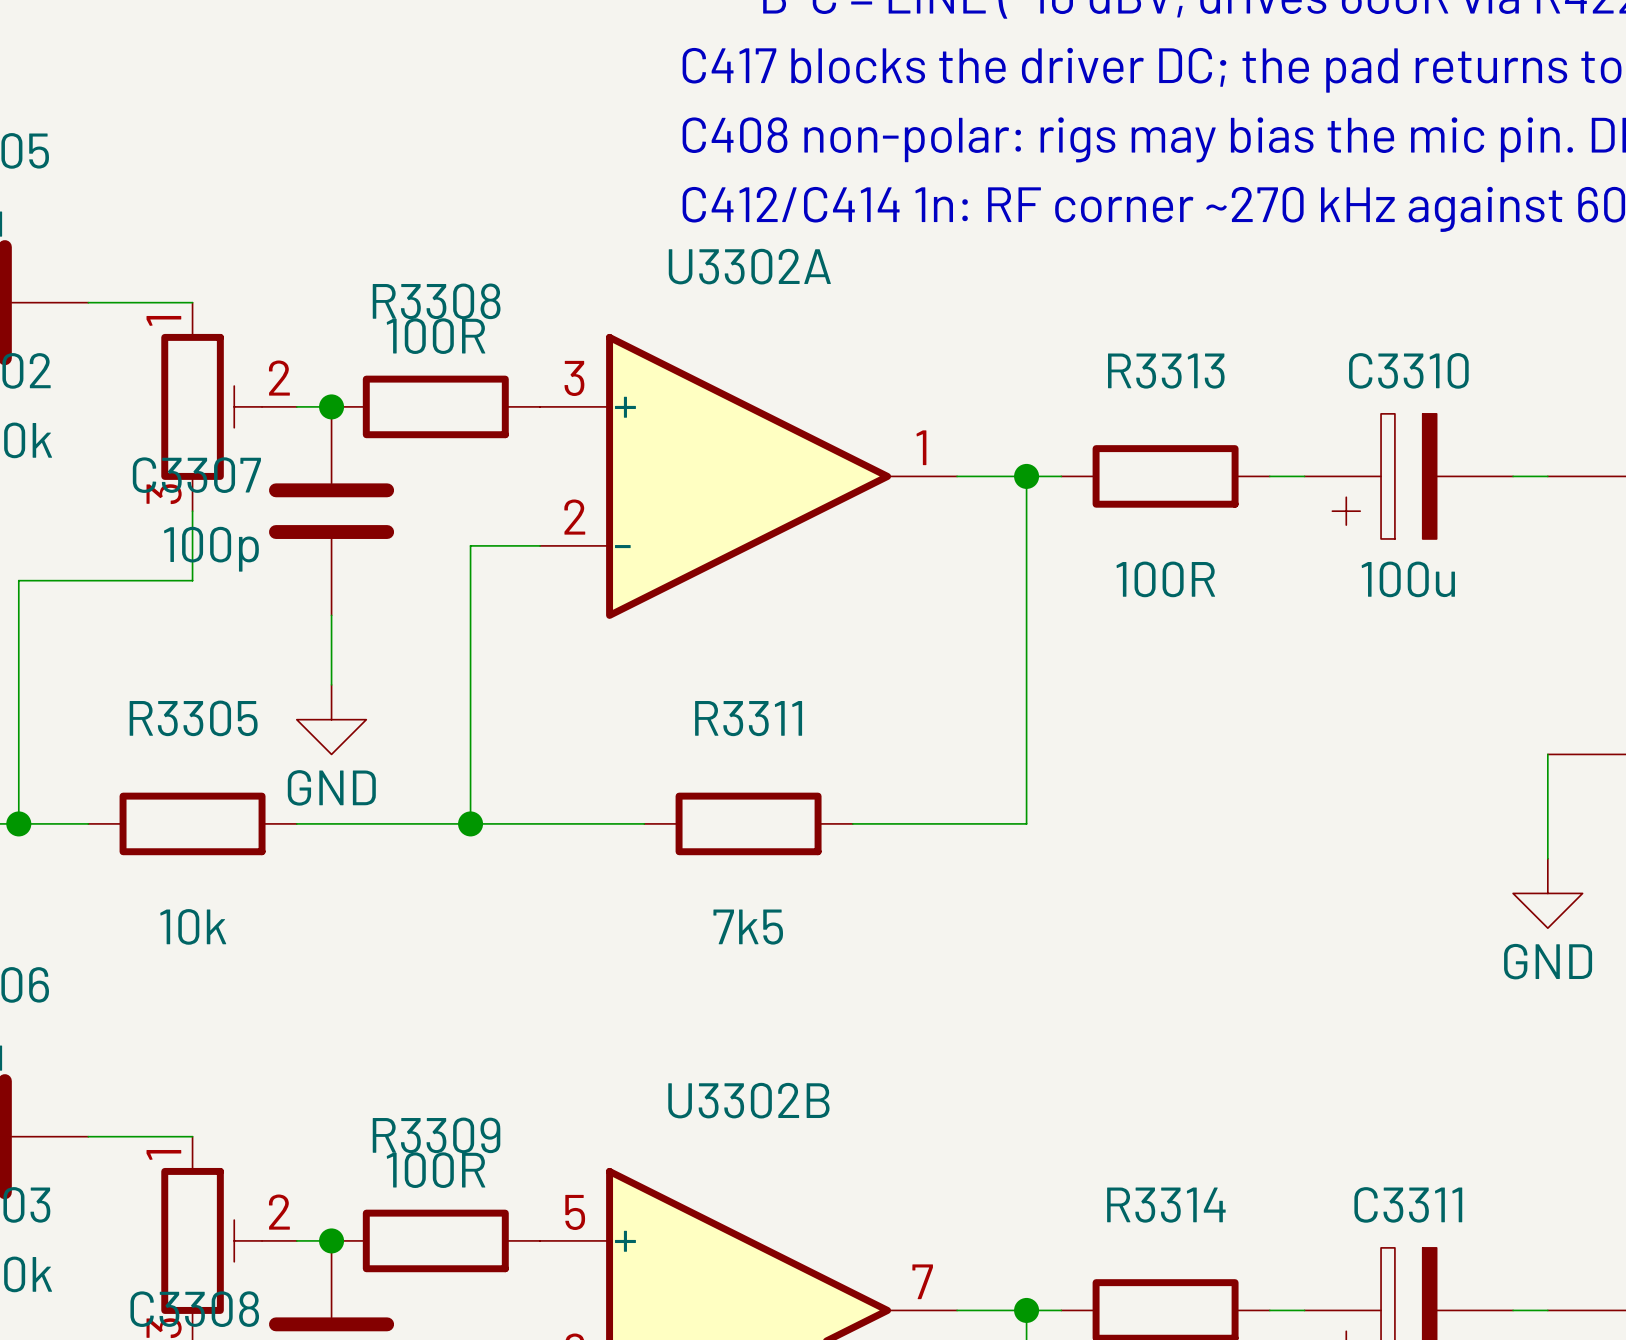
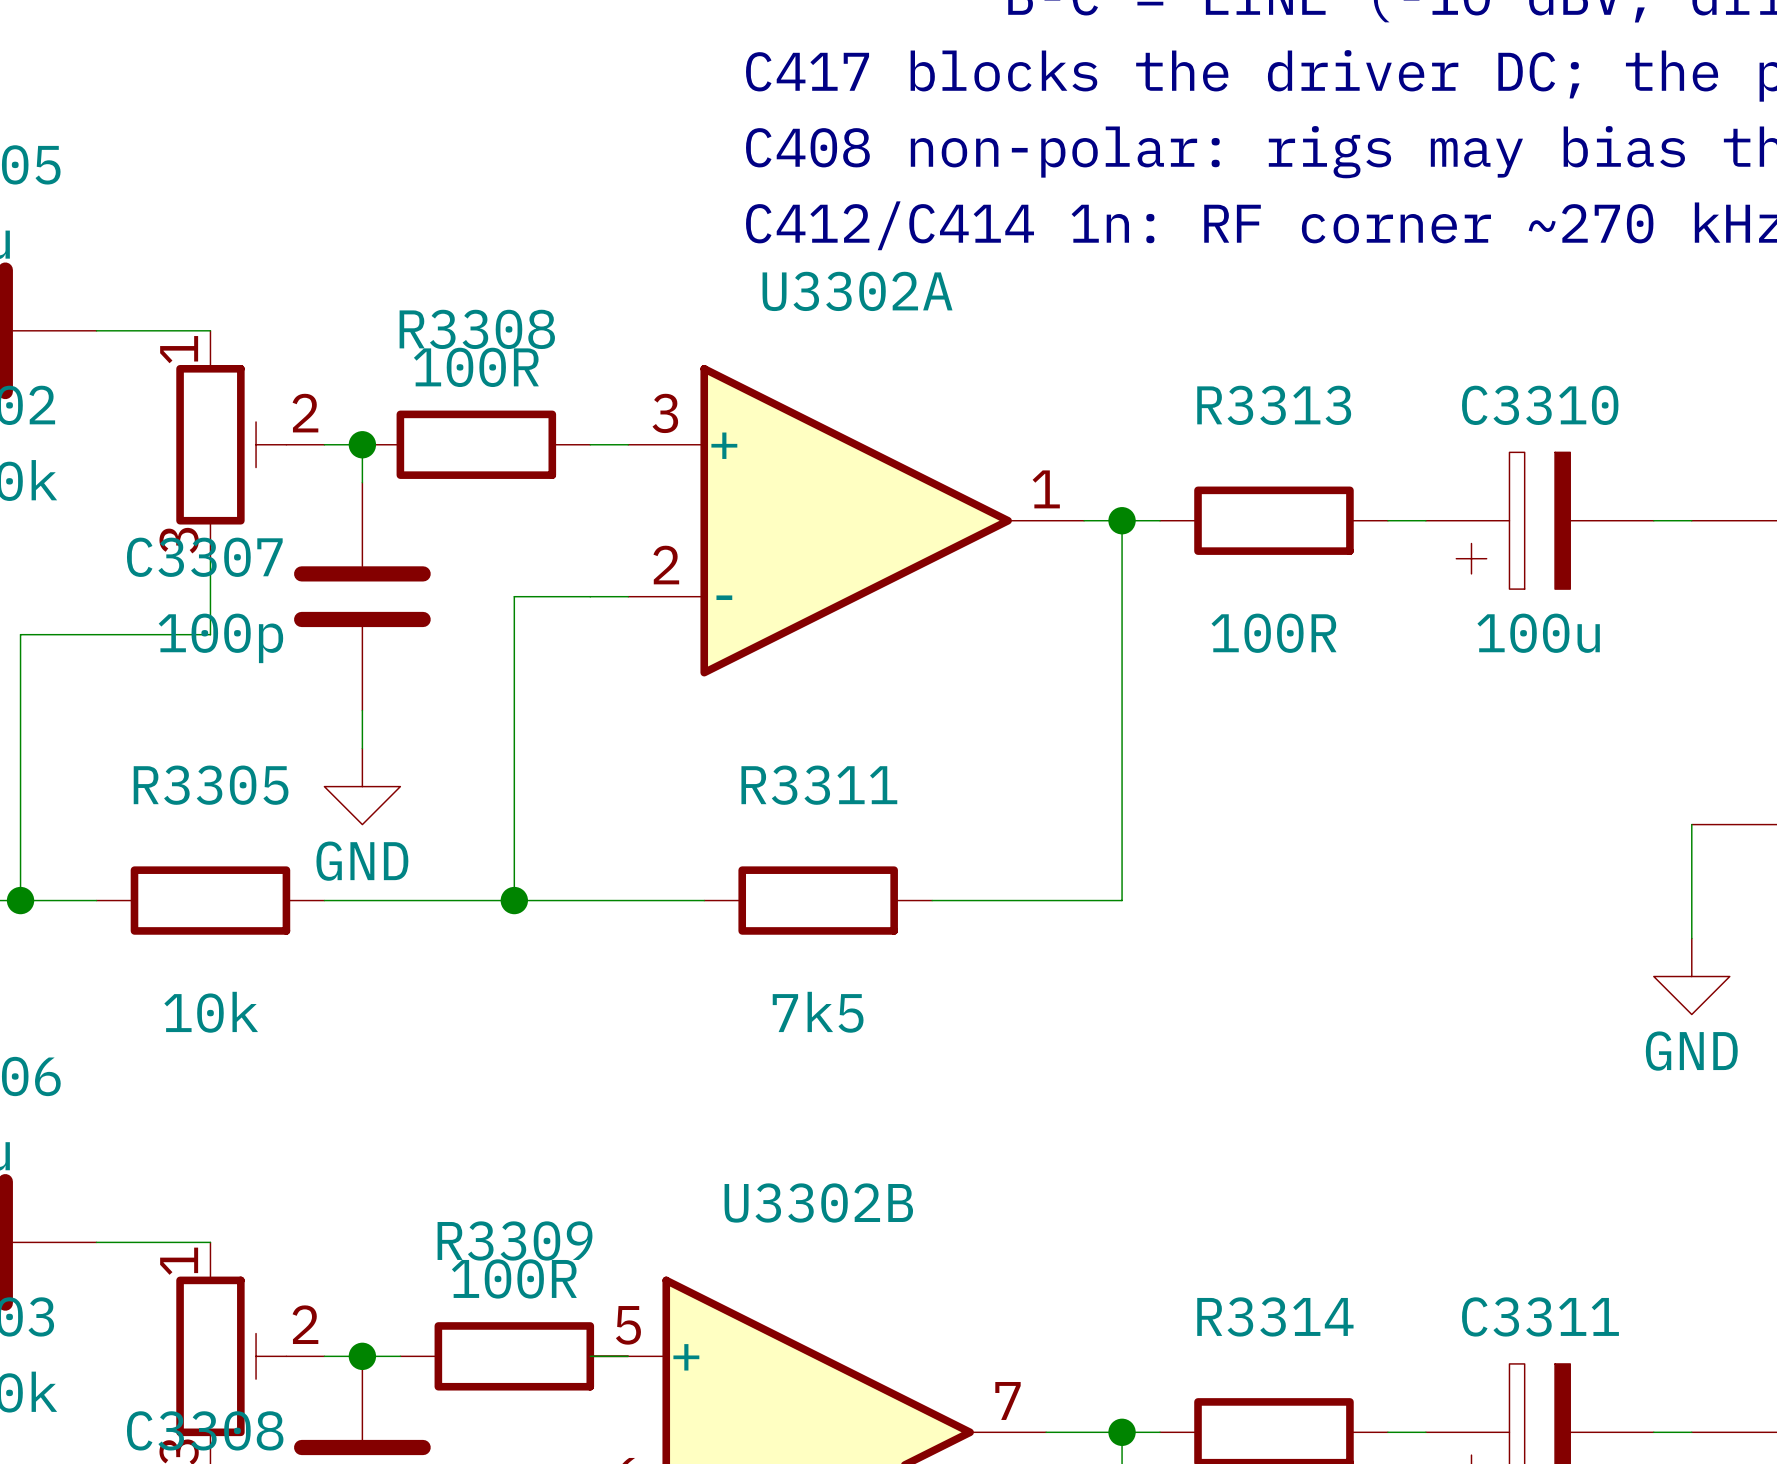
U3302A position: (748, 476) -> (856, 520)
C3307 position: (331, 511) -> (362, 596)
R3309 position: (435, 1240) -> (514, 1356)

